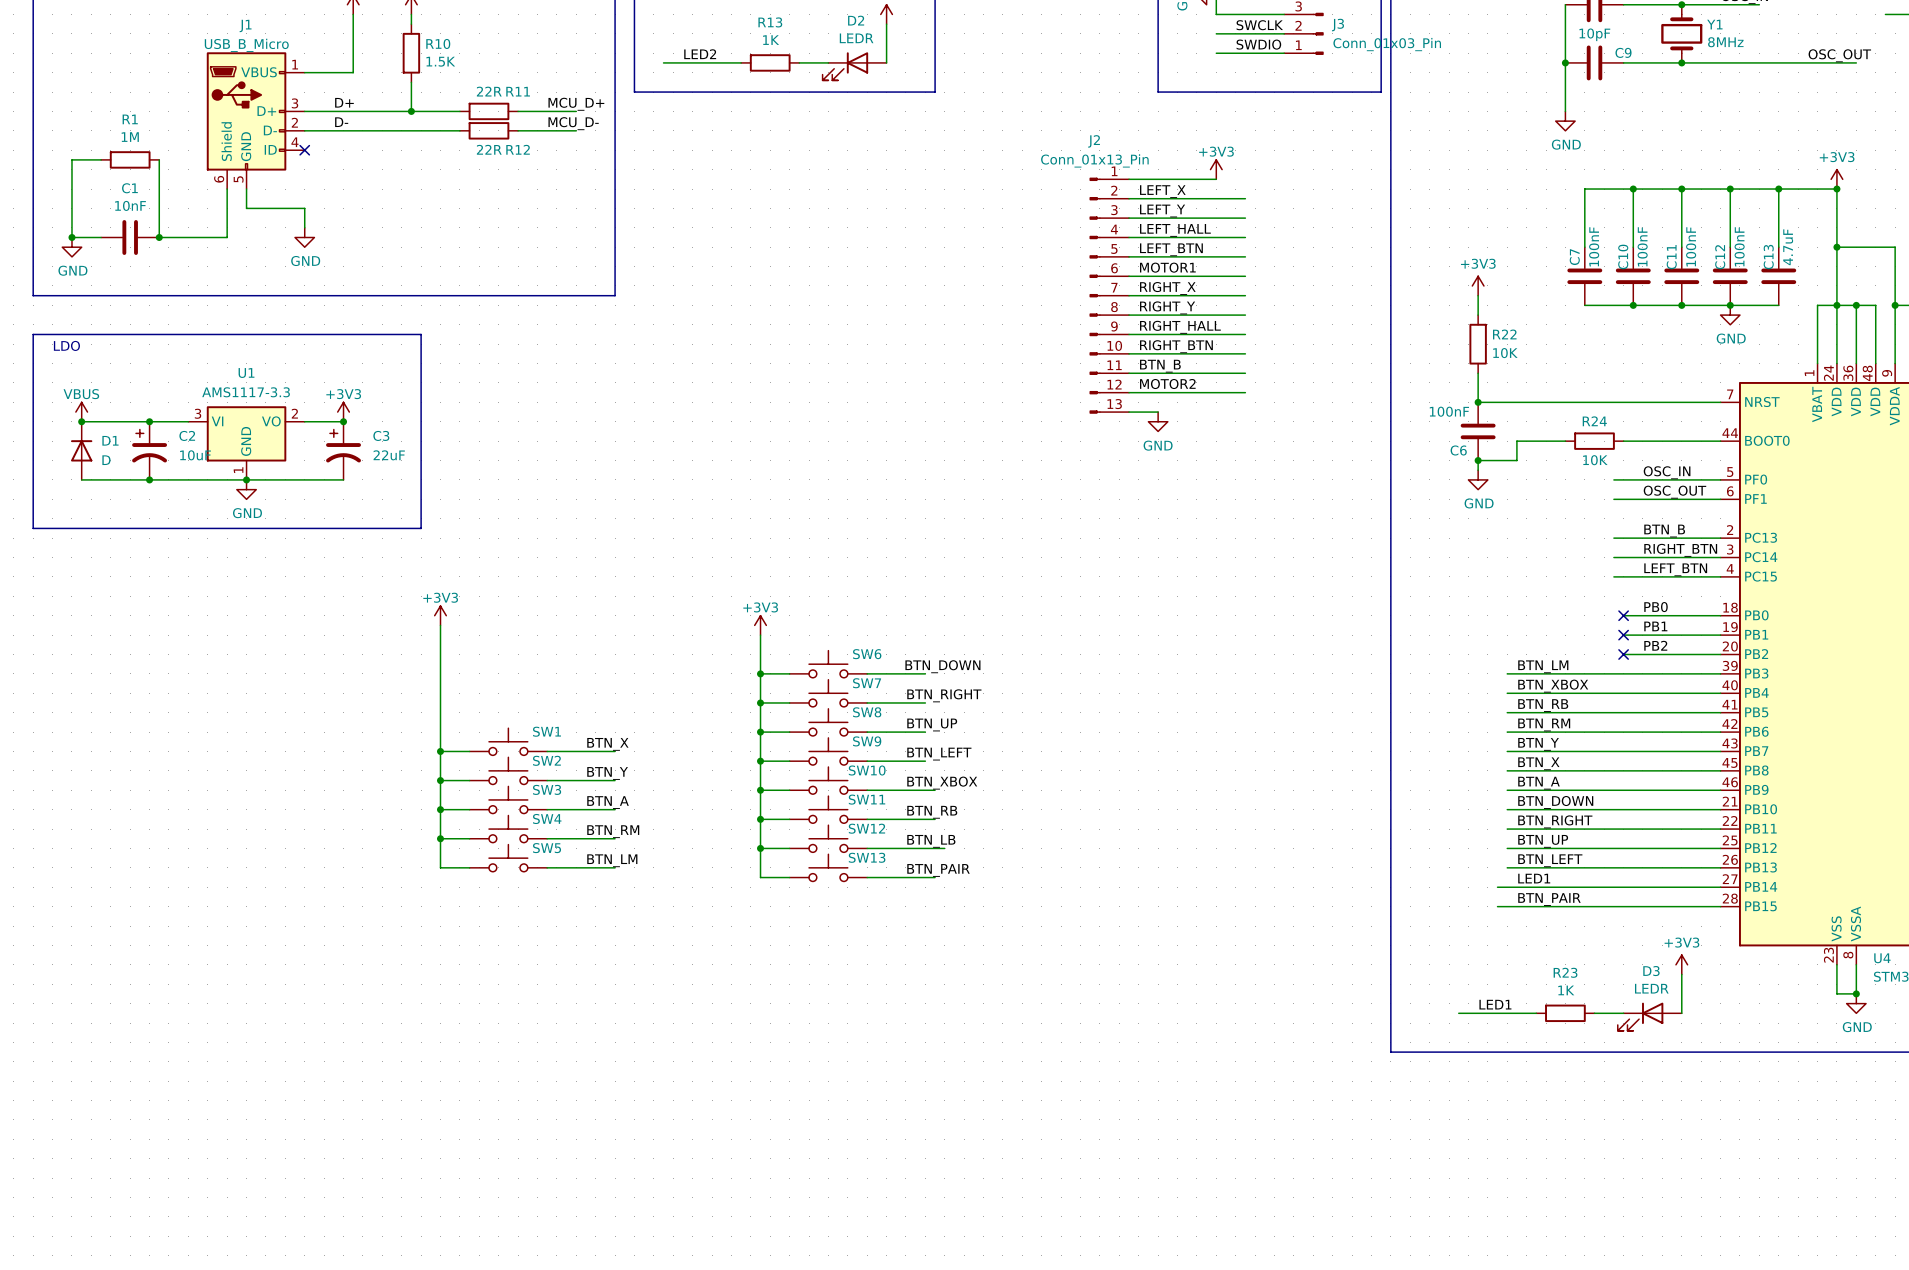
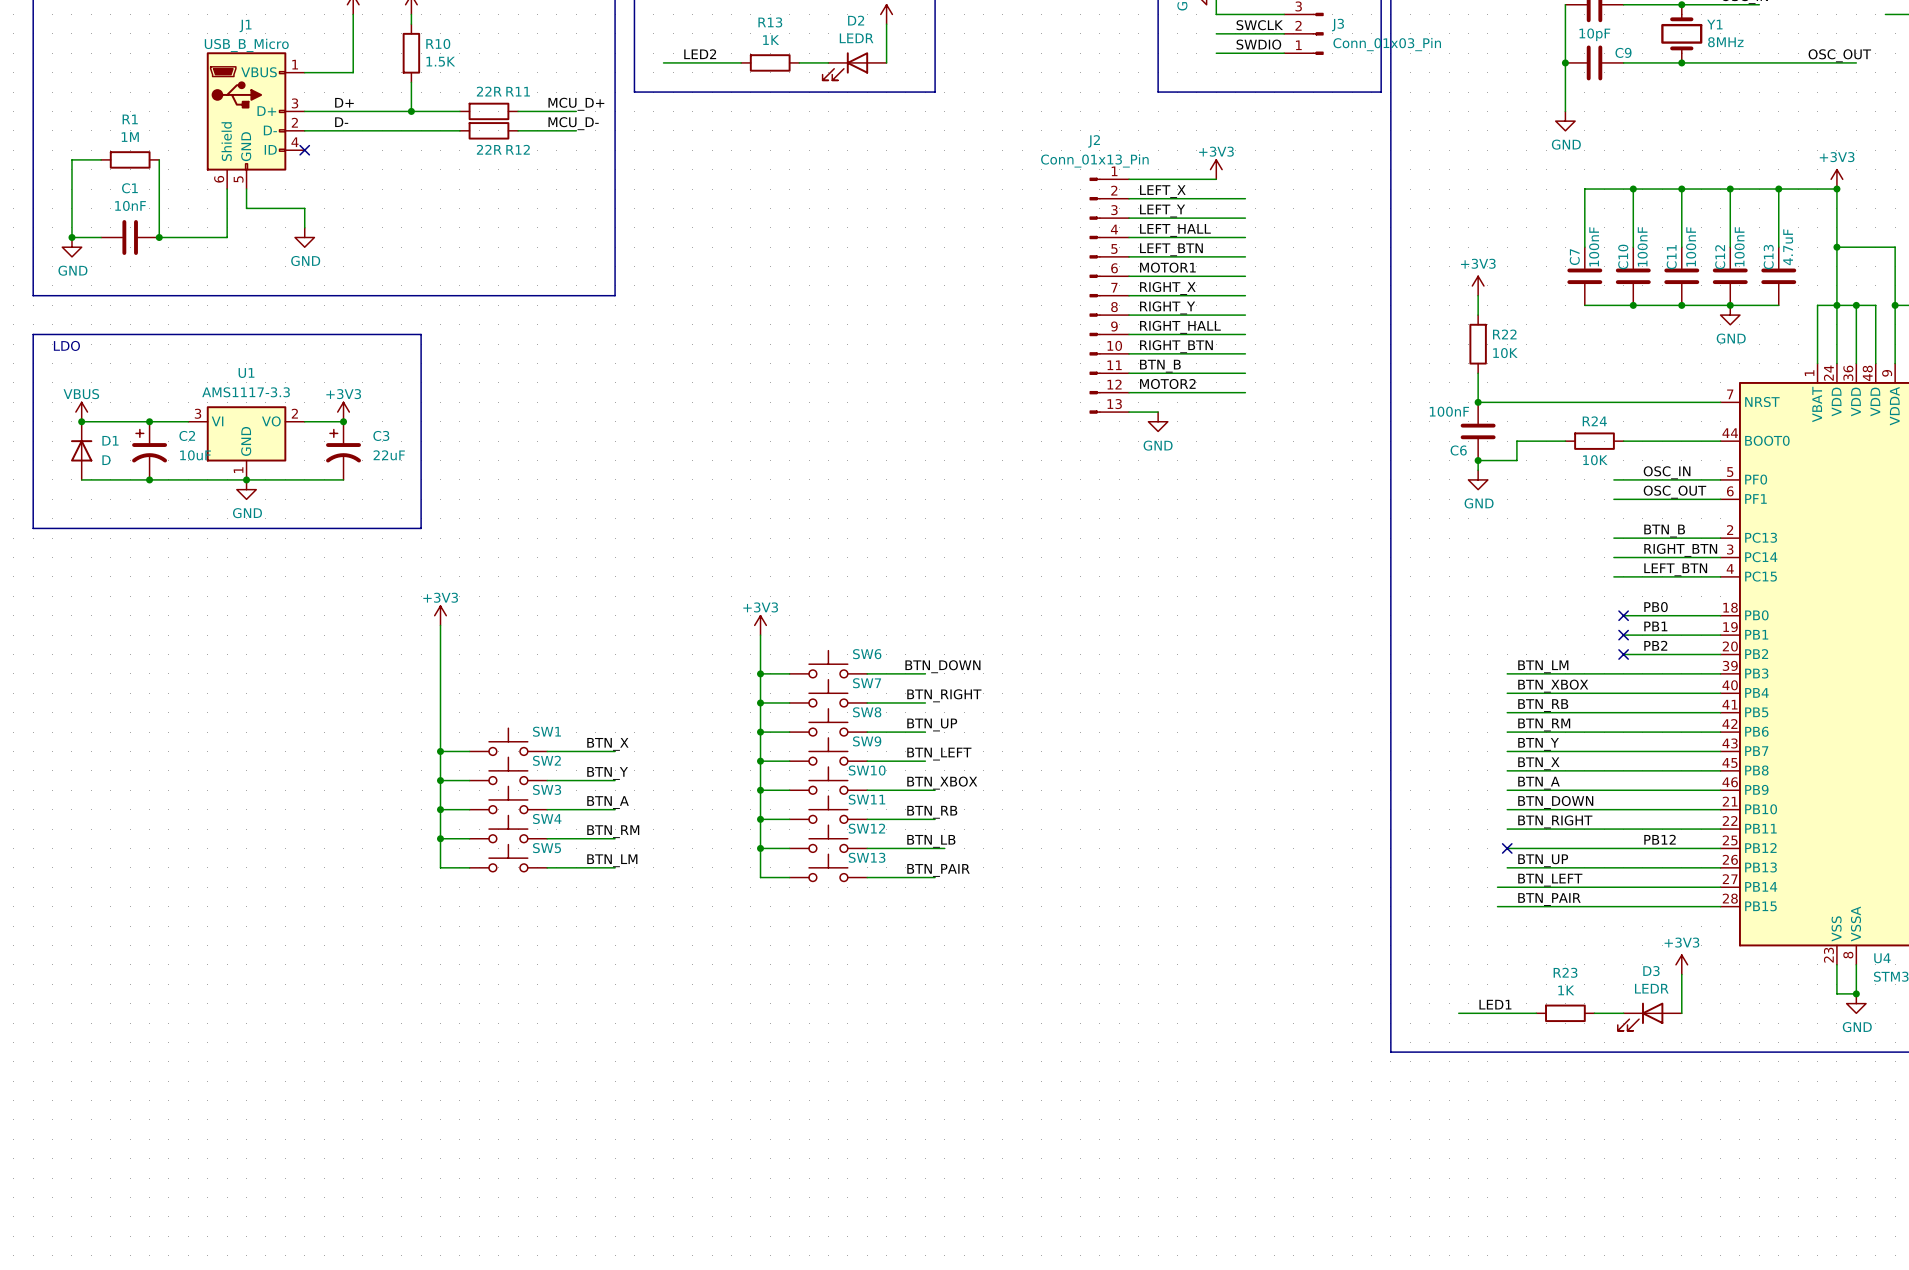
label: none -> PB12 (1660, 839)
label: BTN_UP (1543, 841) -> none
no-connect mark: none -> (1507, 848)
label: BTN_LEFT (1550, 860) -> BTN_UP (1543, 860)
label: LED1 (1534, 878) -> BTN_LEFT (1550, 880)

